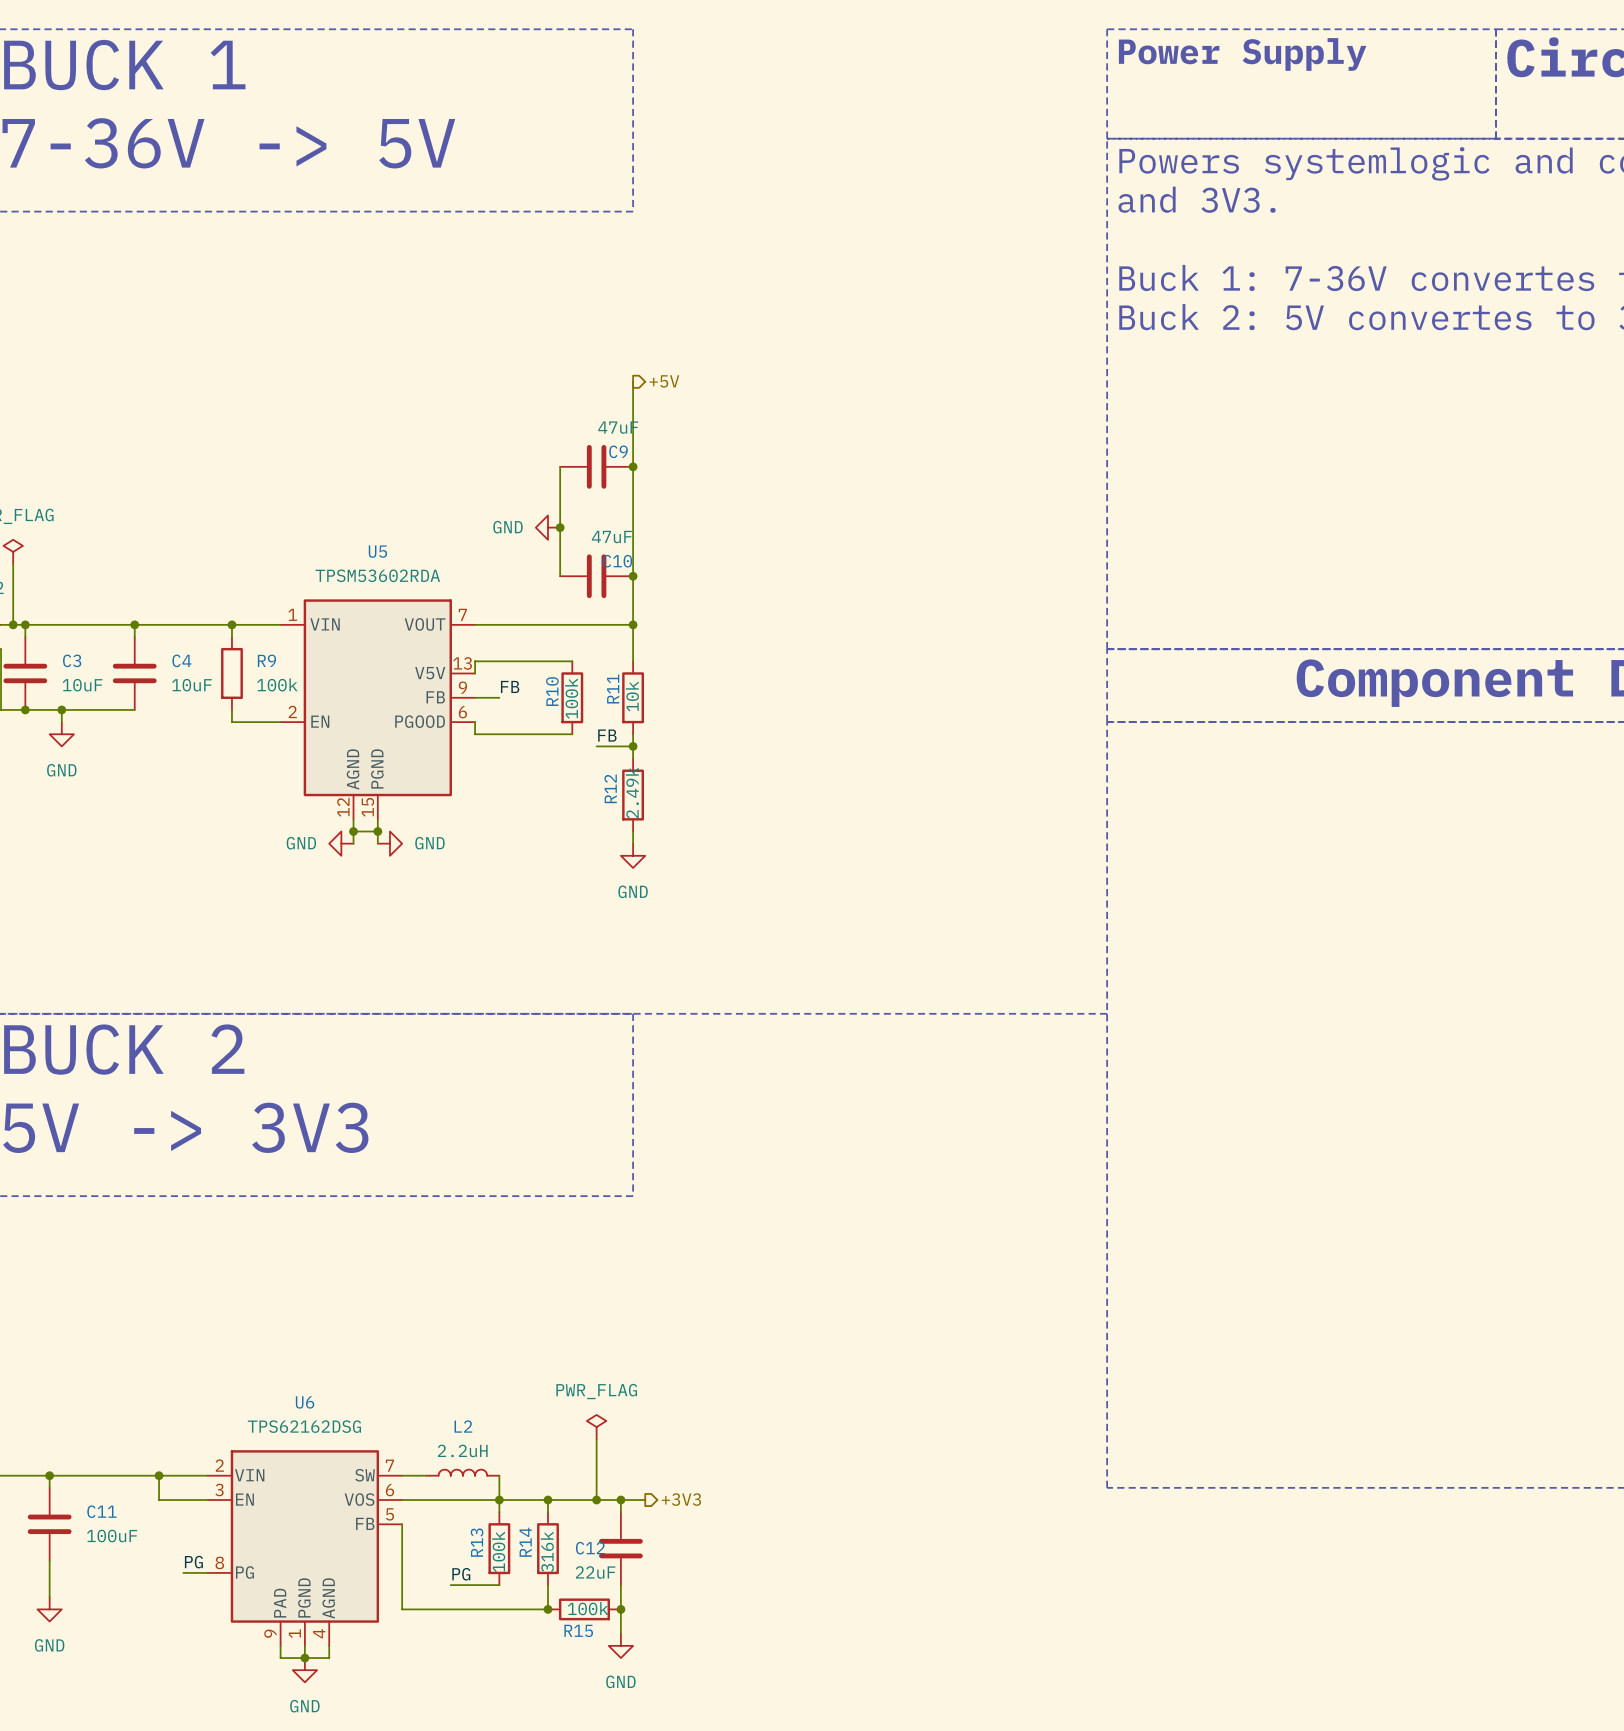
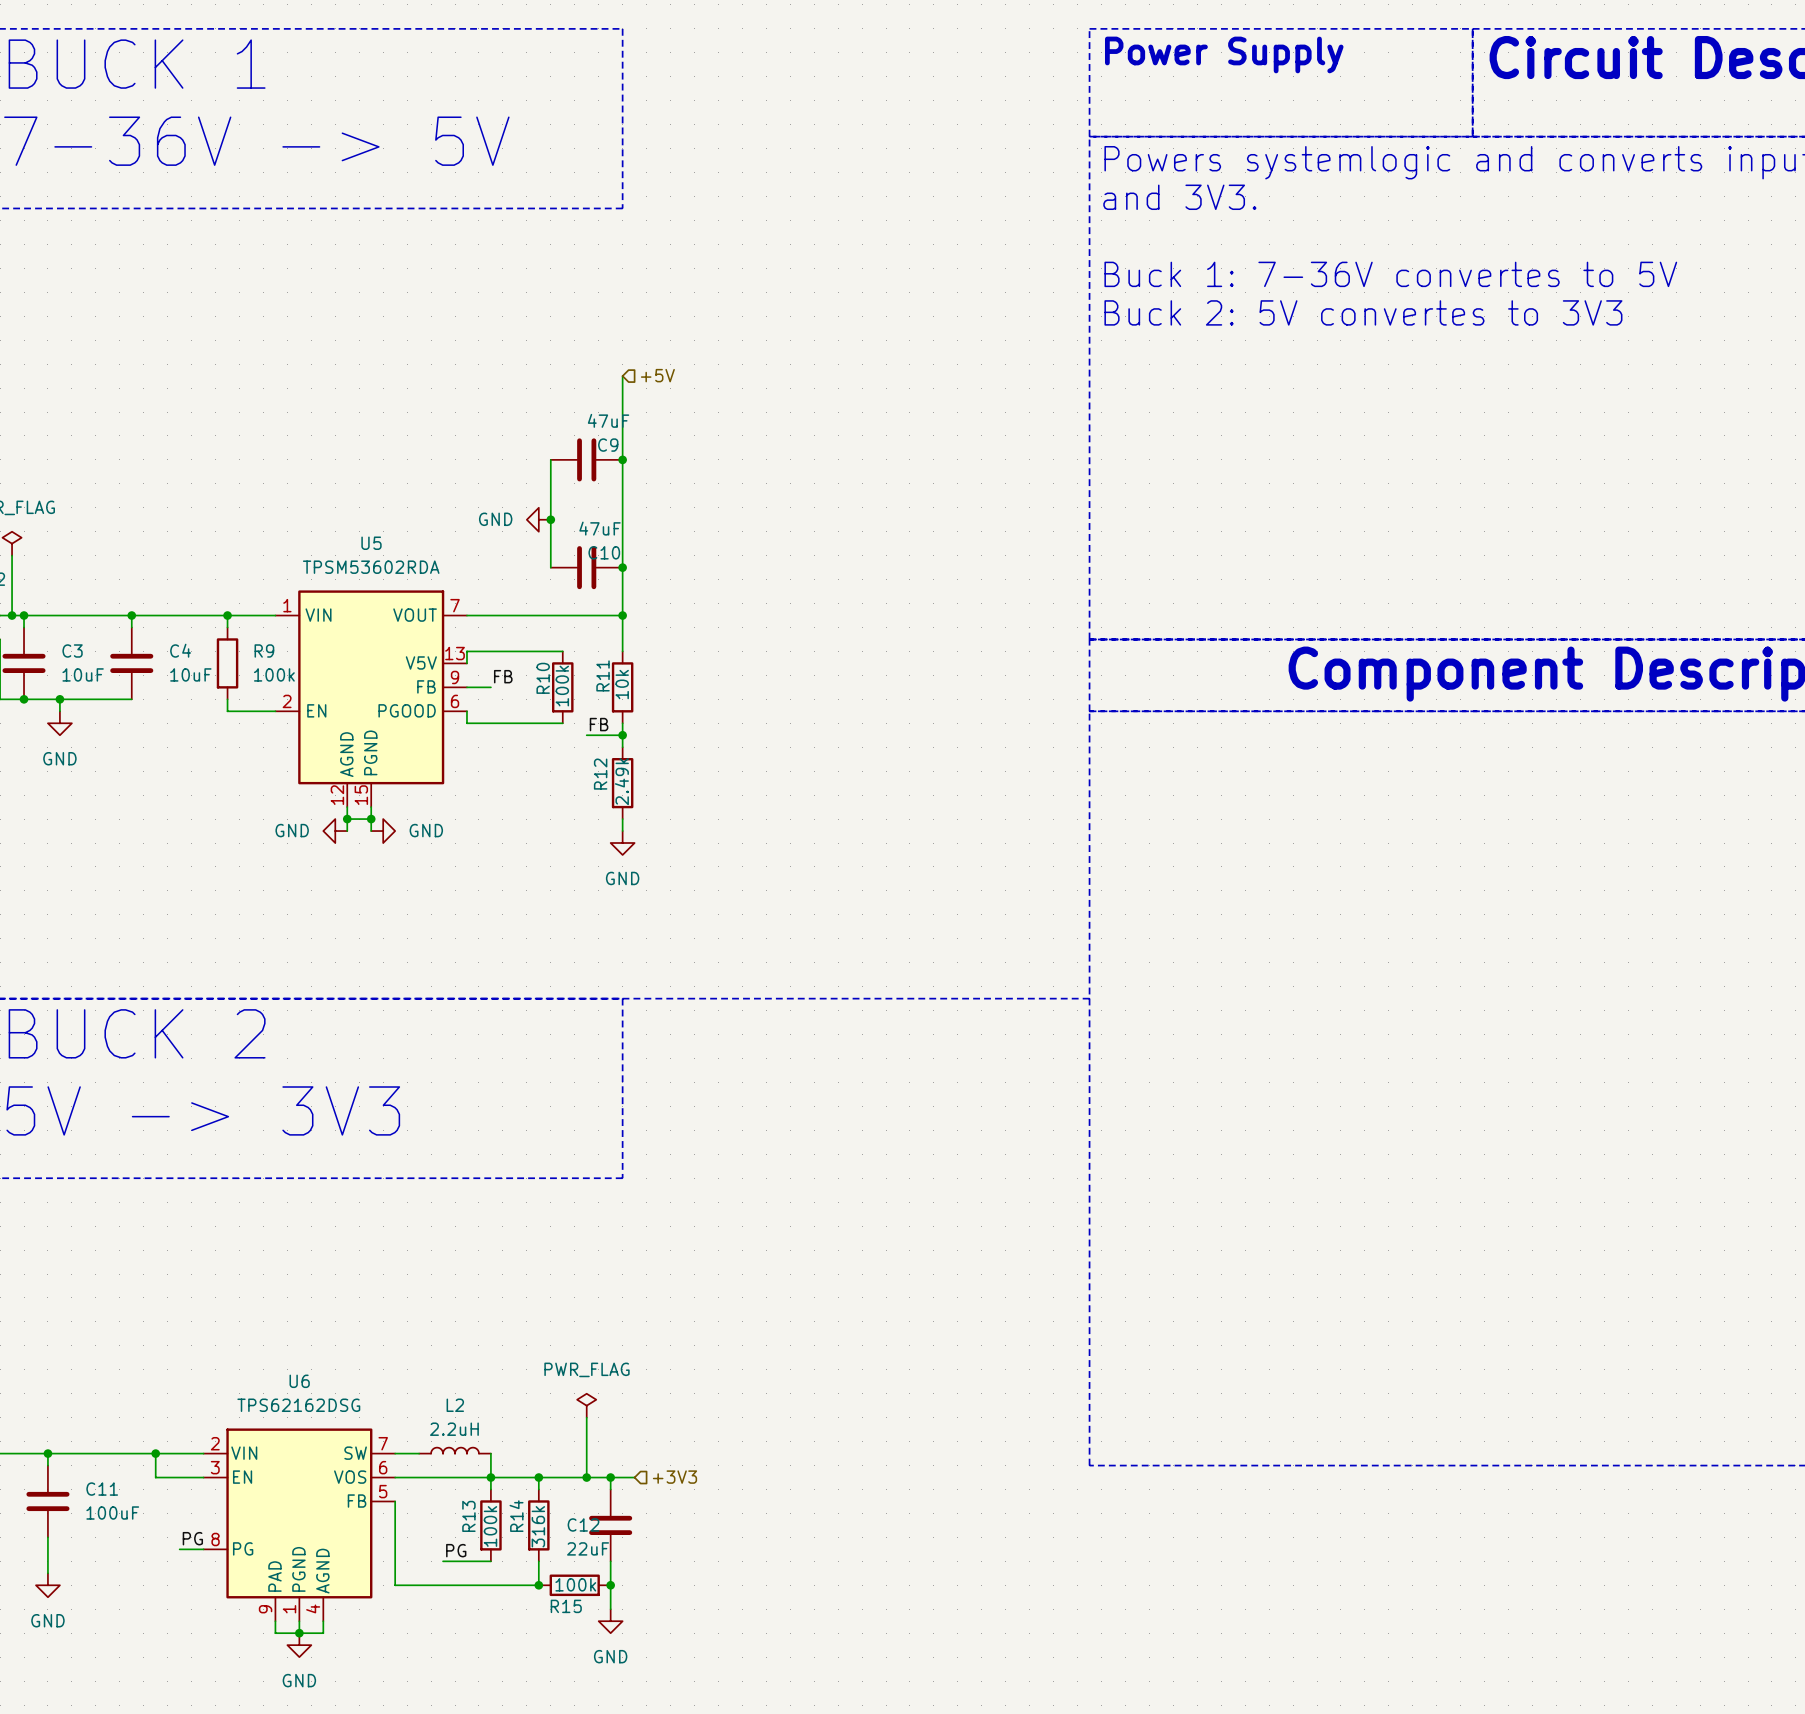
hierarchical label shape: output (664, 381) -> input (657, 375)
hierarchical label shape: output (681, 1499) -> input (674, 1477)

